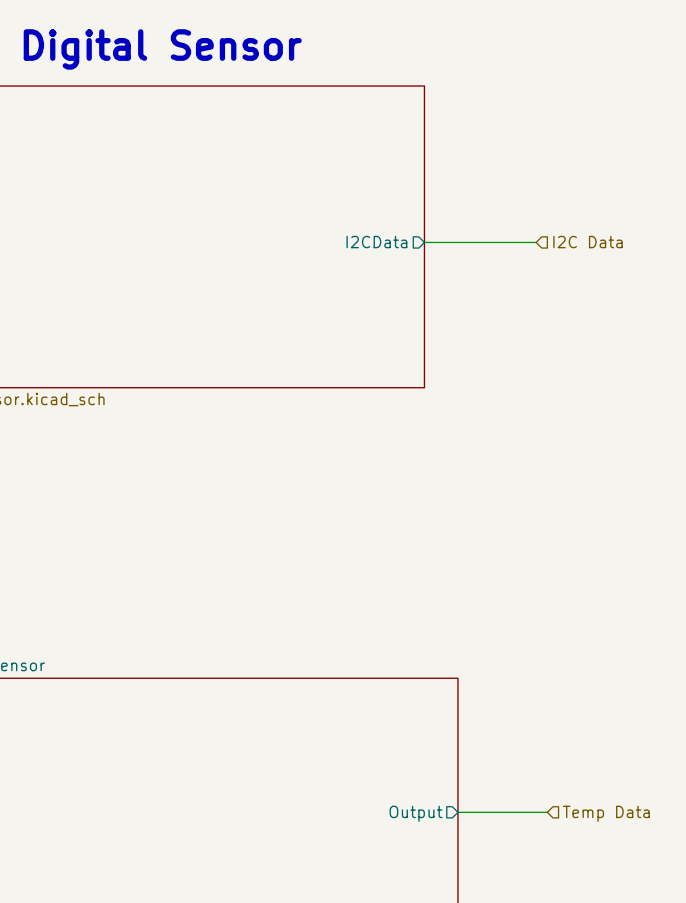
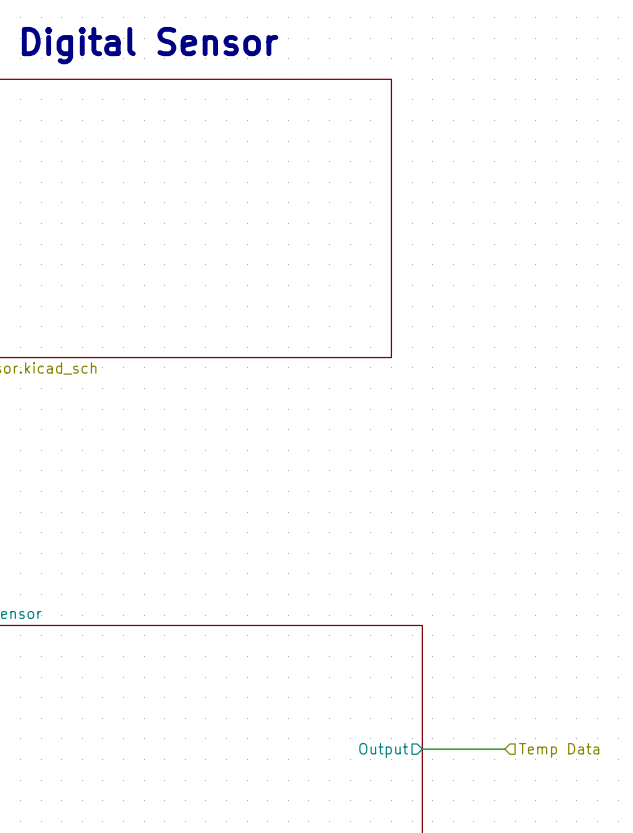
sheet pin: I2CData (376, 242) -> none
wire: (424, 242) (536, 242) -> none
hierarchical label: I2C Data (587, 242) -> none

